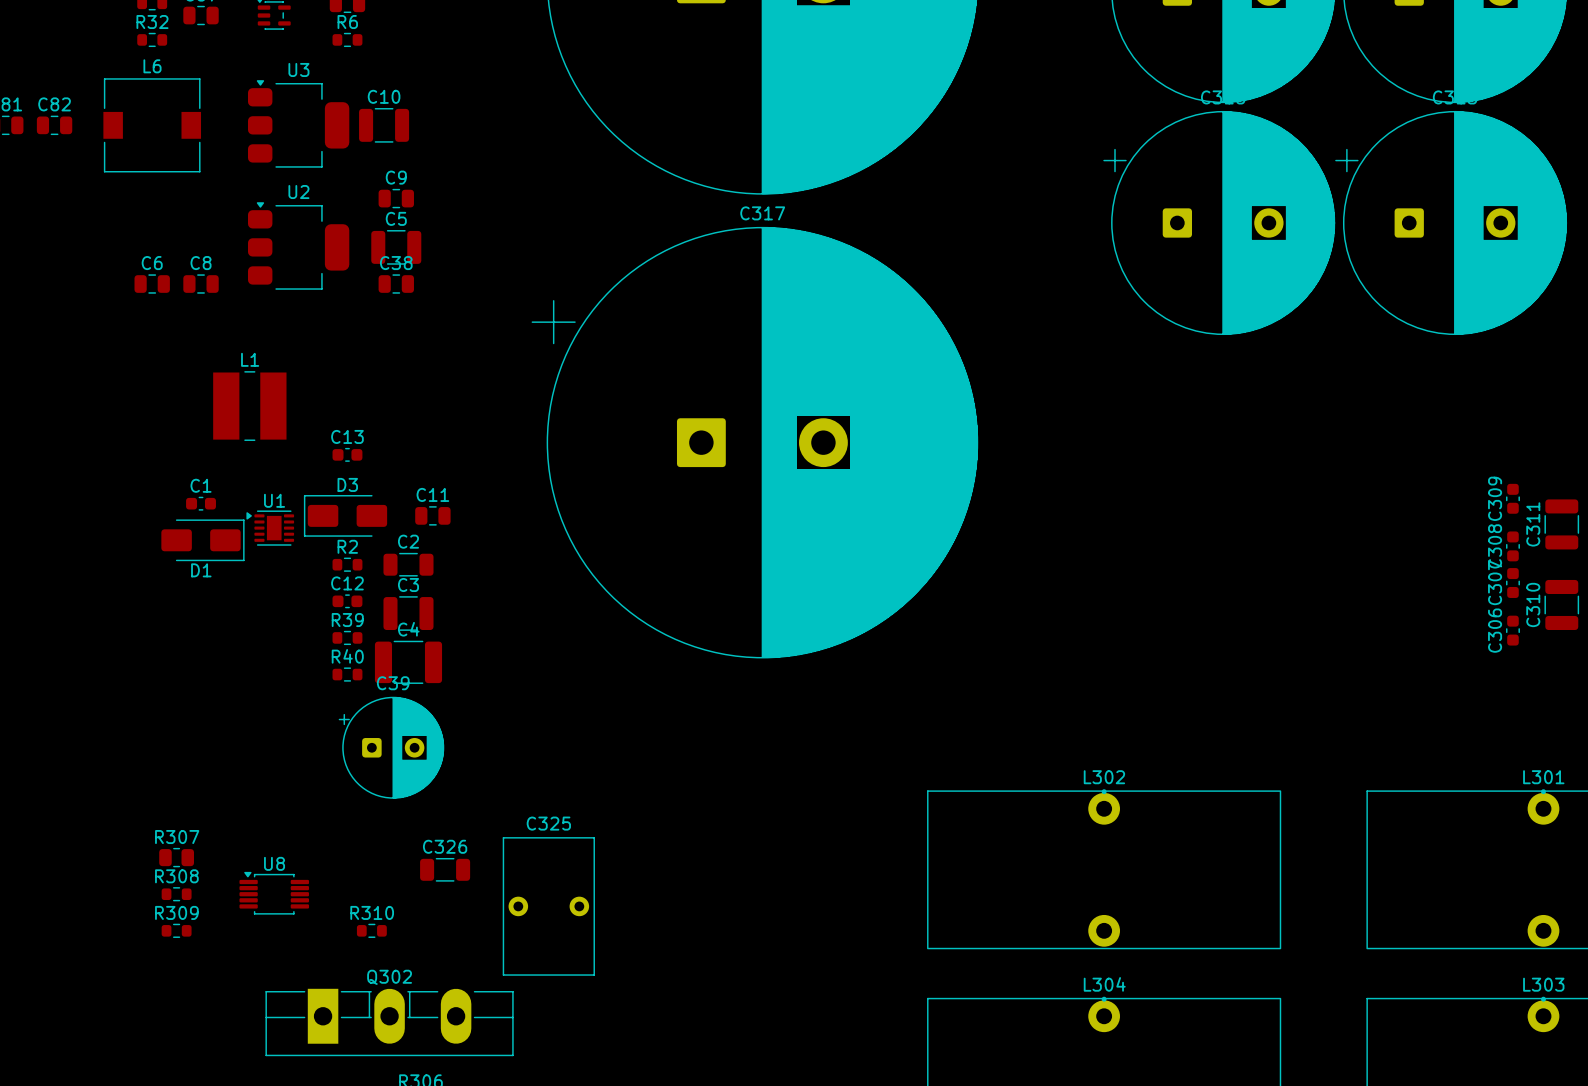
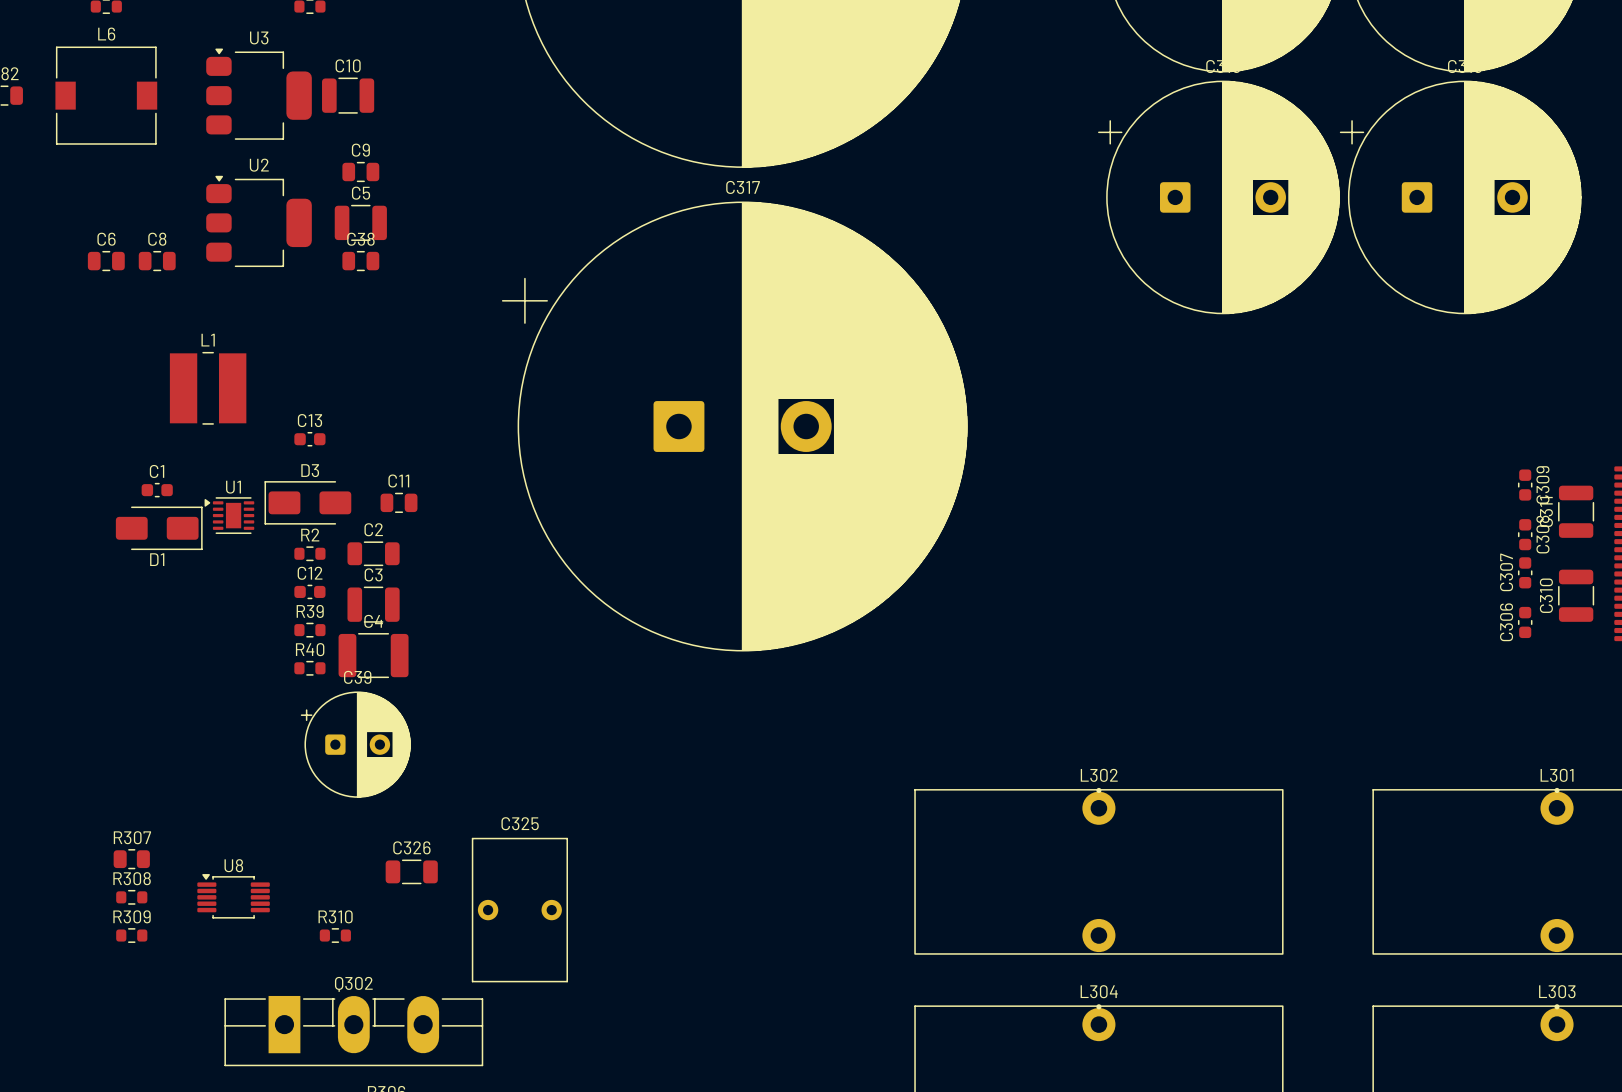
C309 name position: C309 (1495, 498) -> C309 (1542, 484)
C308 name position: C308 (1495, 546) -> C308 (1542, 534)

